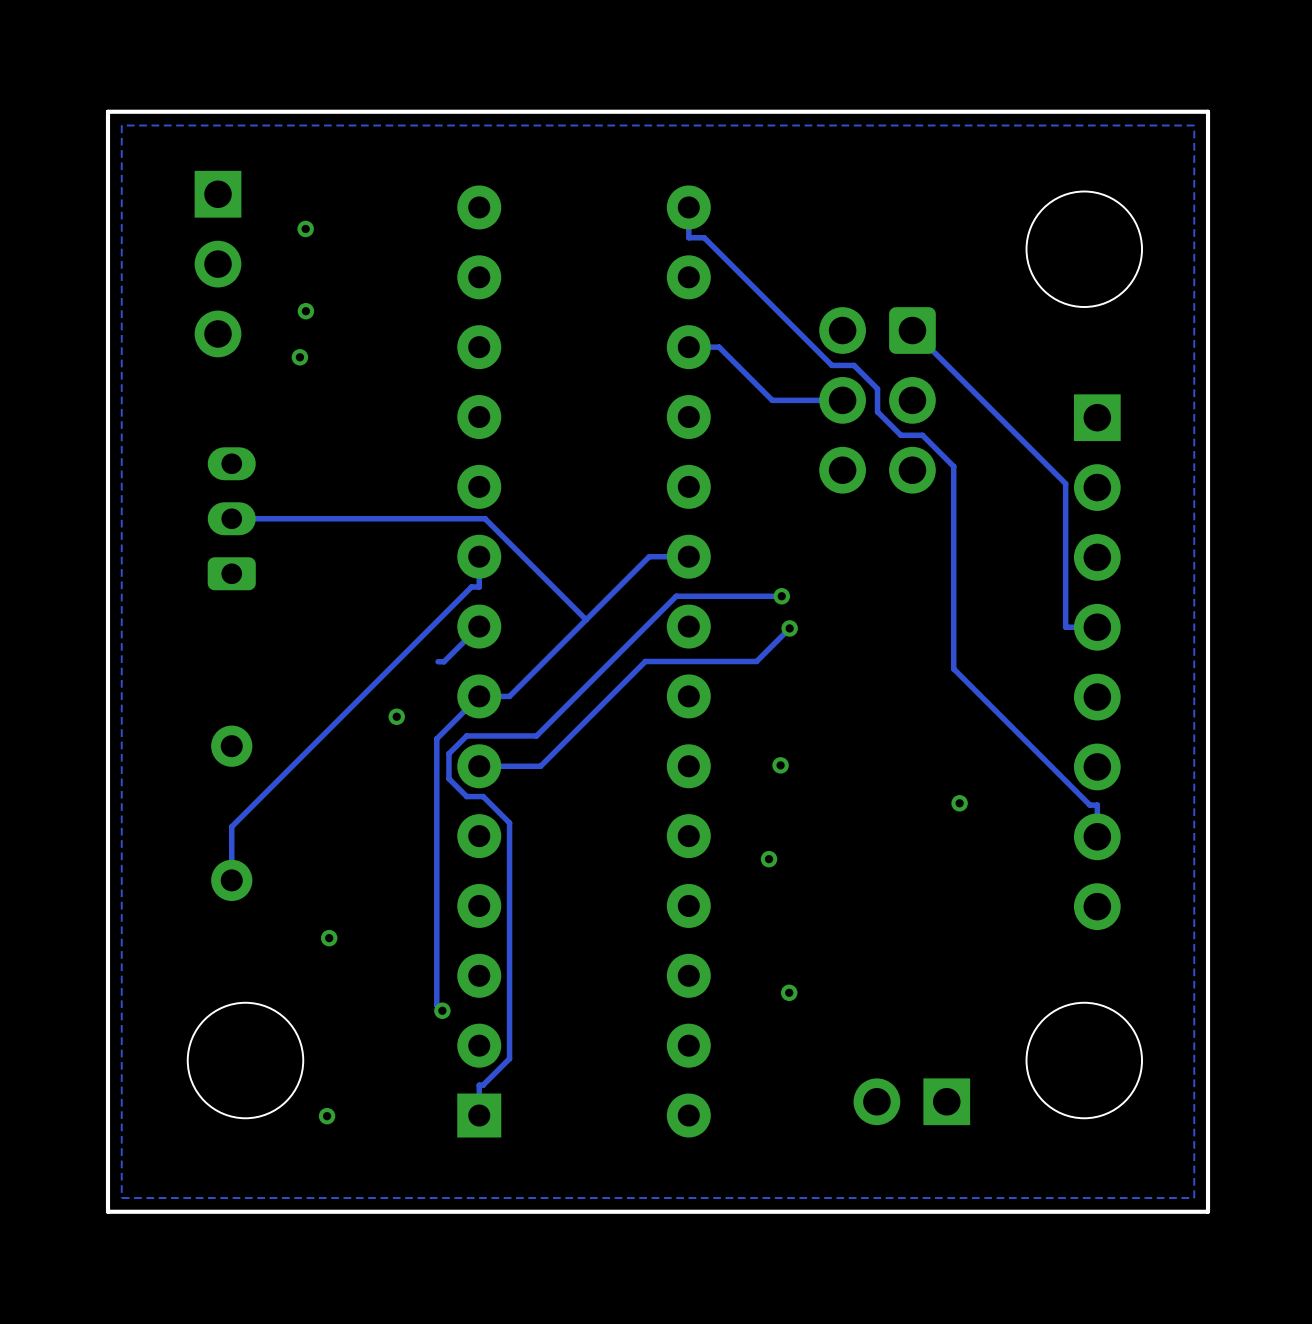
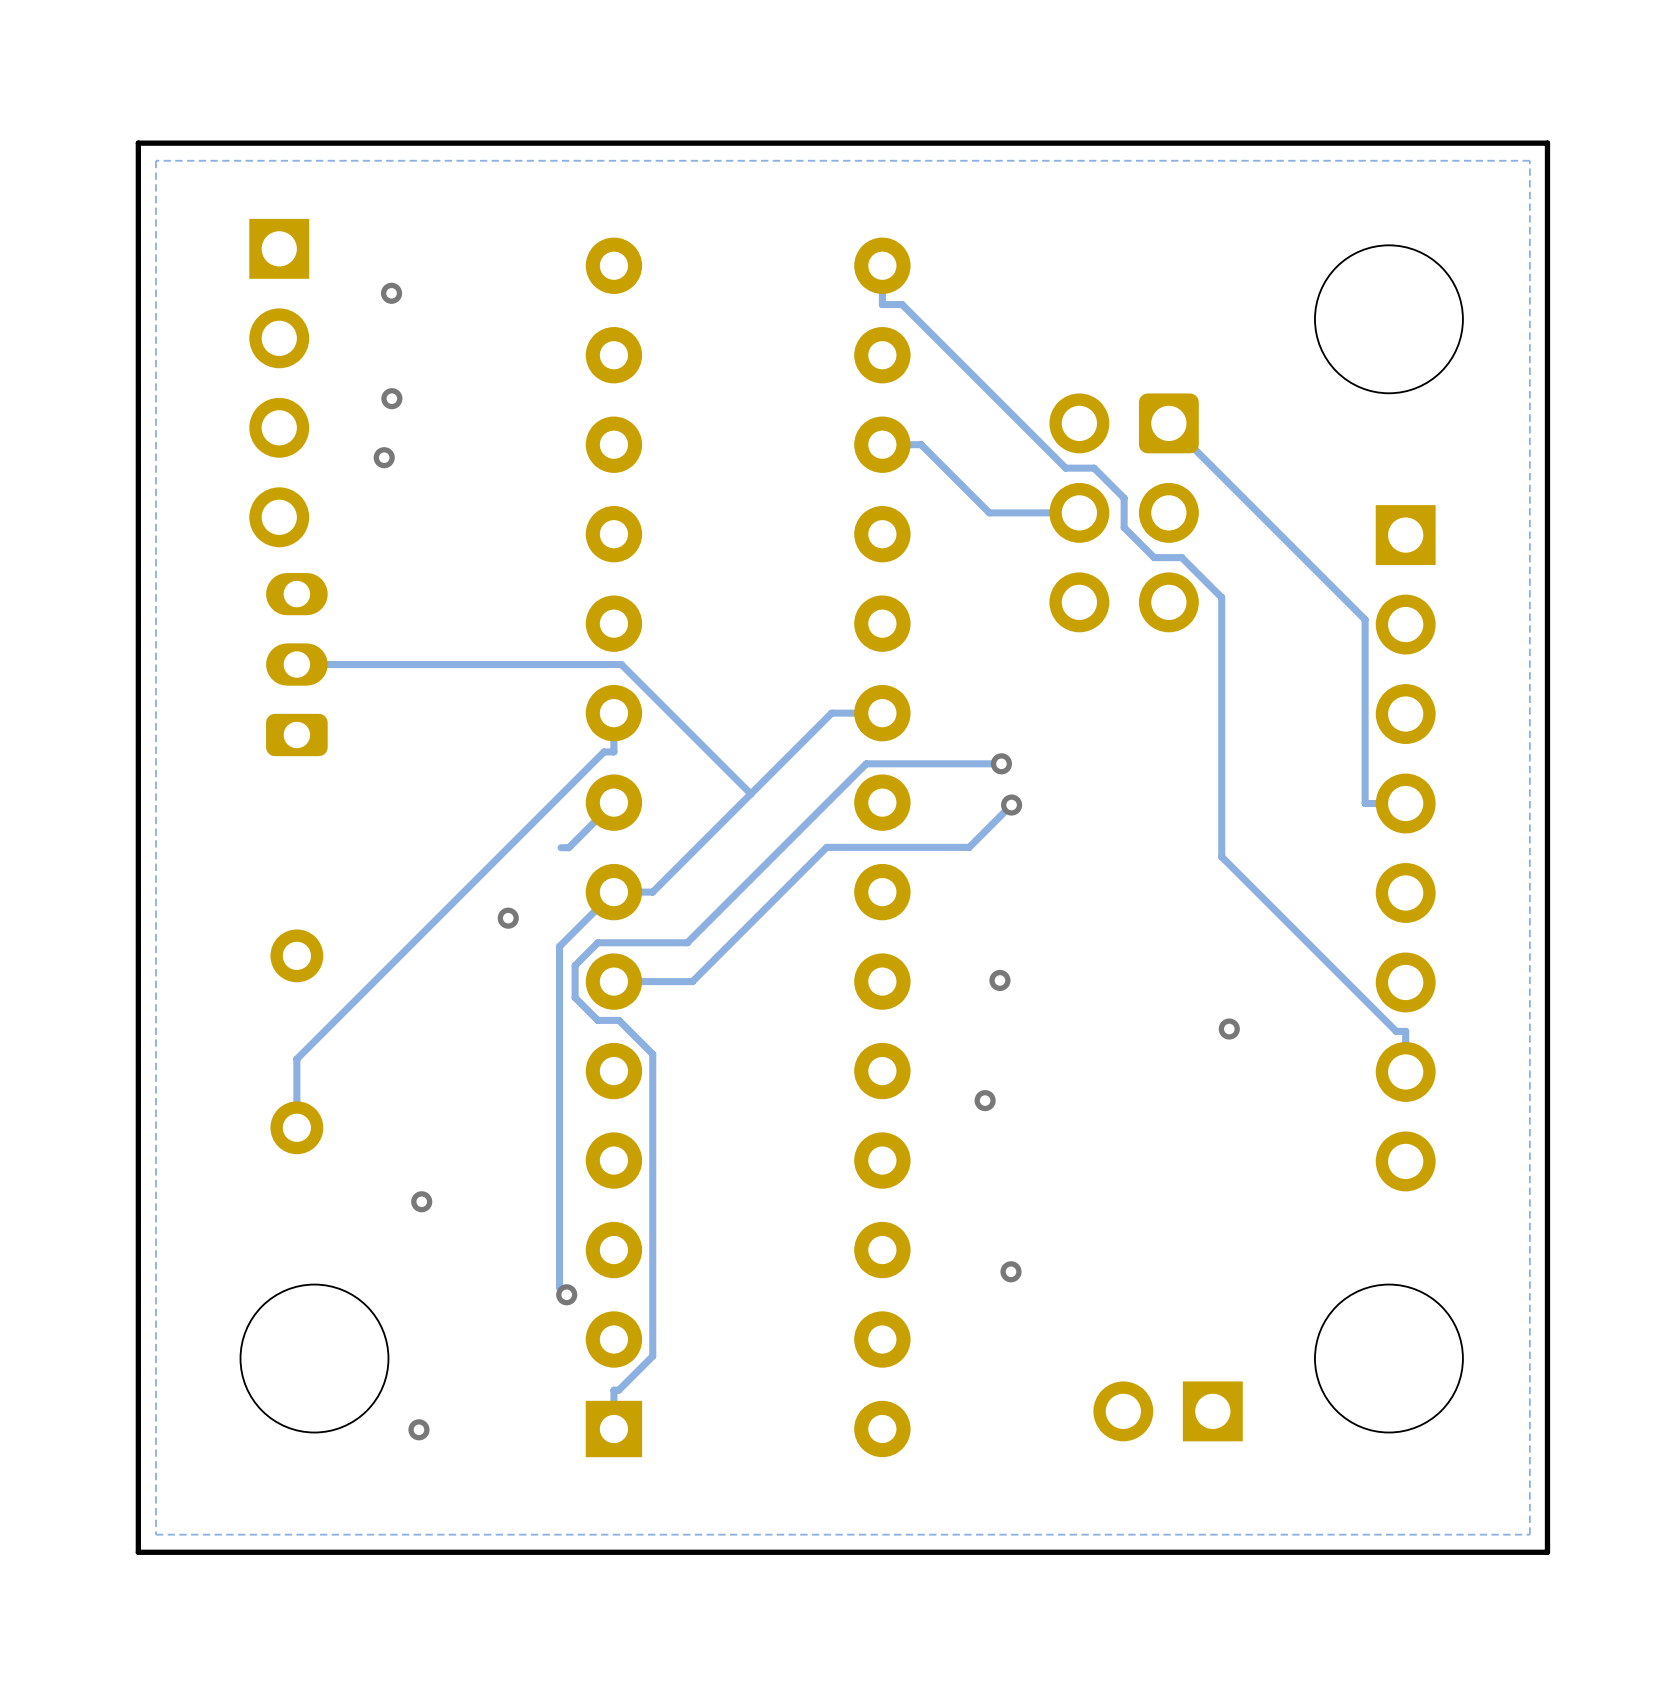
part: none -> (279, 383)

